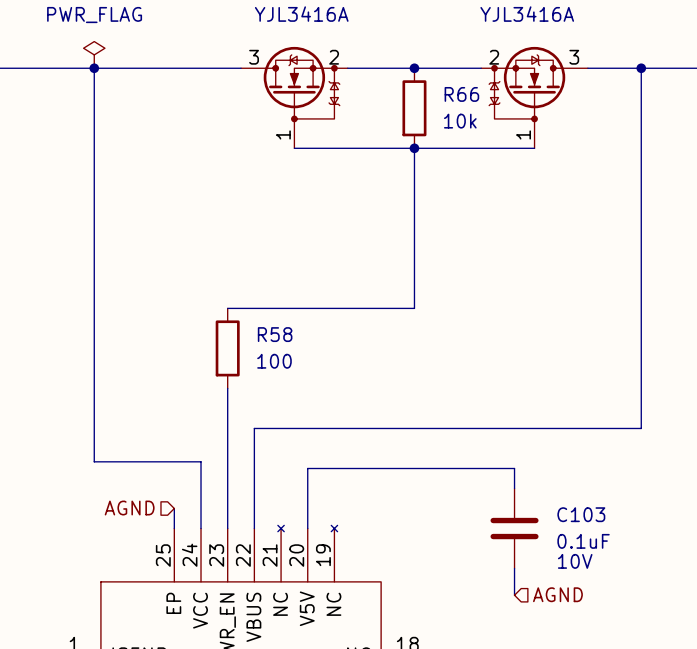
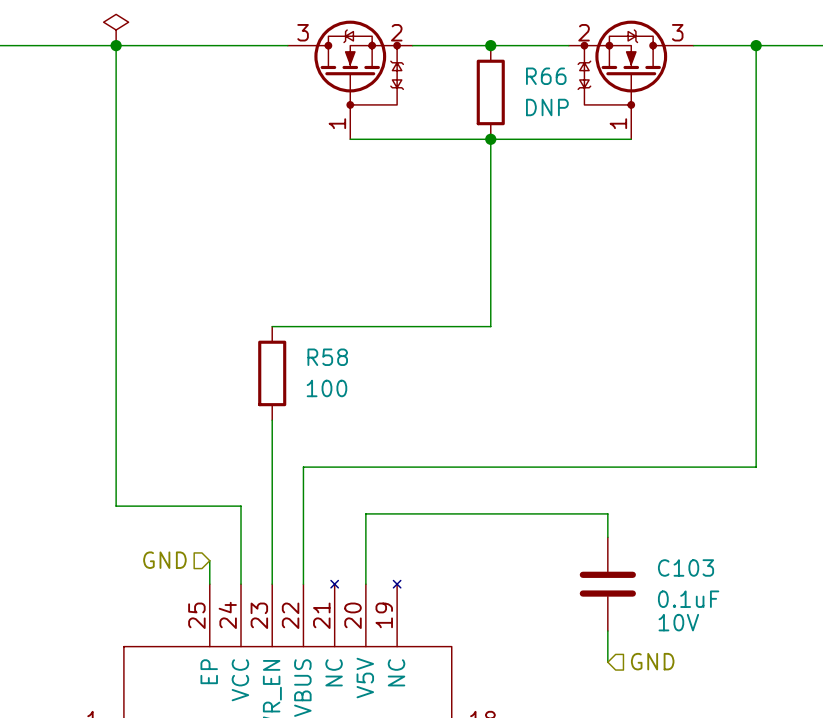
R66 value: 10k (460, 121) -> DNP (547, 107)
hierarchical label: AGND (129, 508) -> GND (164, 560)
hierarchical label: AGND (557, 594) -> GND (652, 661)

